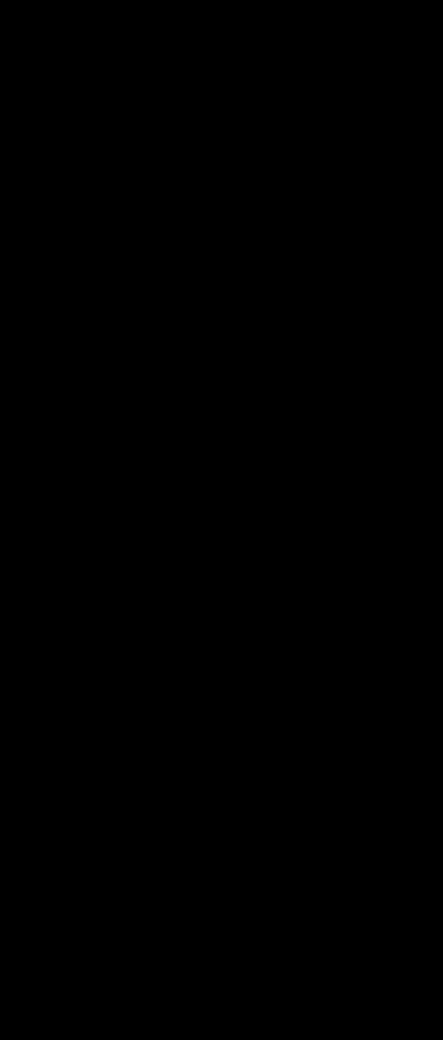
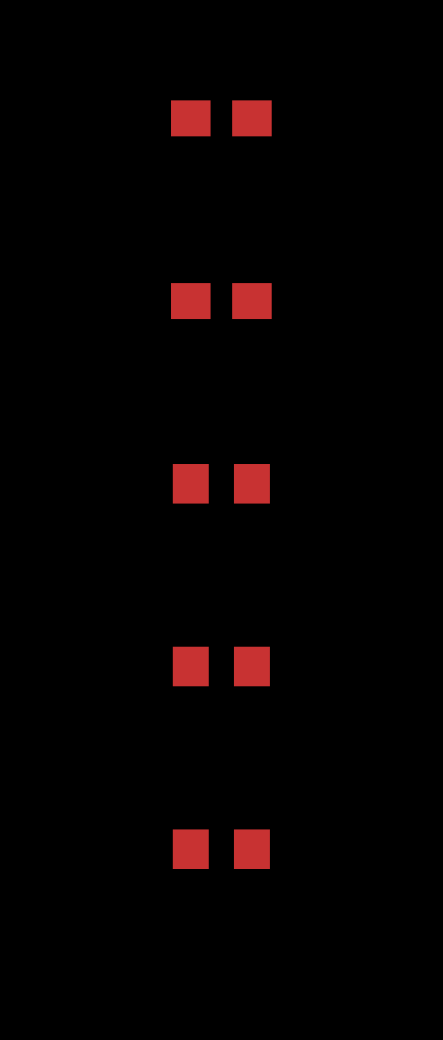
part: none -> (221, 118)
part: none -> (221, 301)
part: none -> (221, 483)
part: none -> (221, 666)
part: none -> (221, 849)

